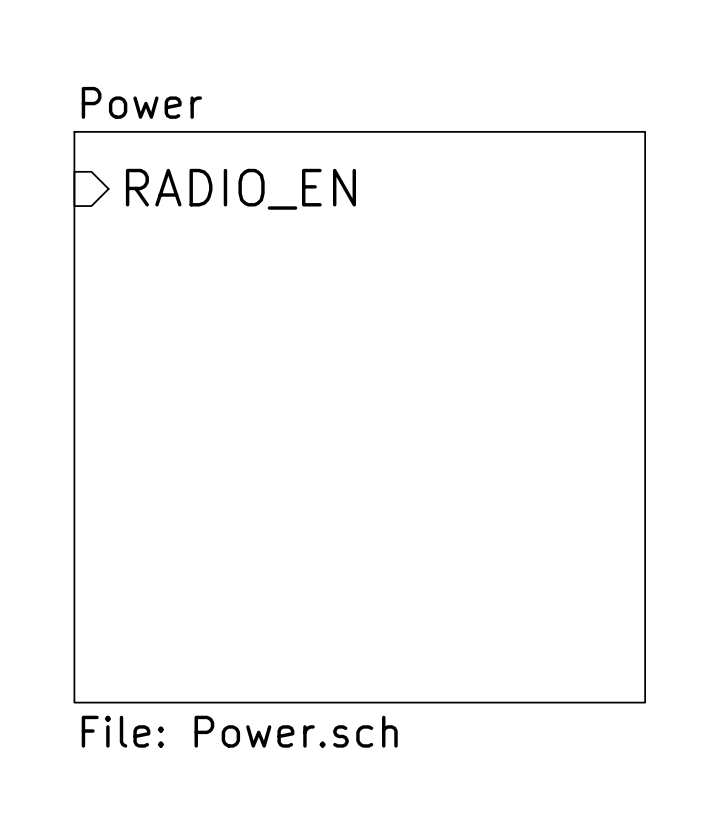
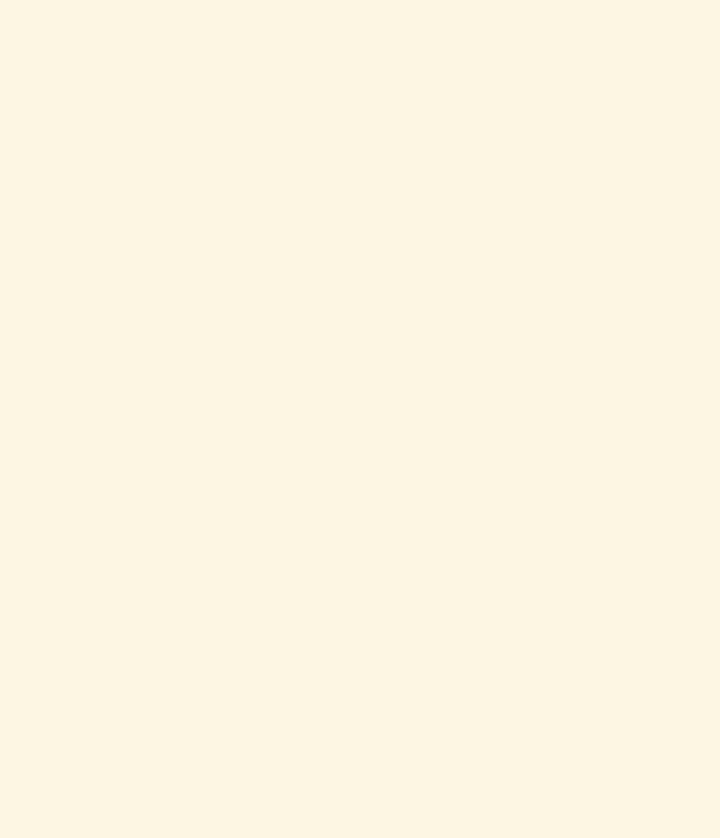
sheet pin: RADIO_EN (240, 189) -> none
sheet Power: File: Power.sch (359, 417) -> none

